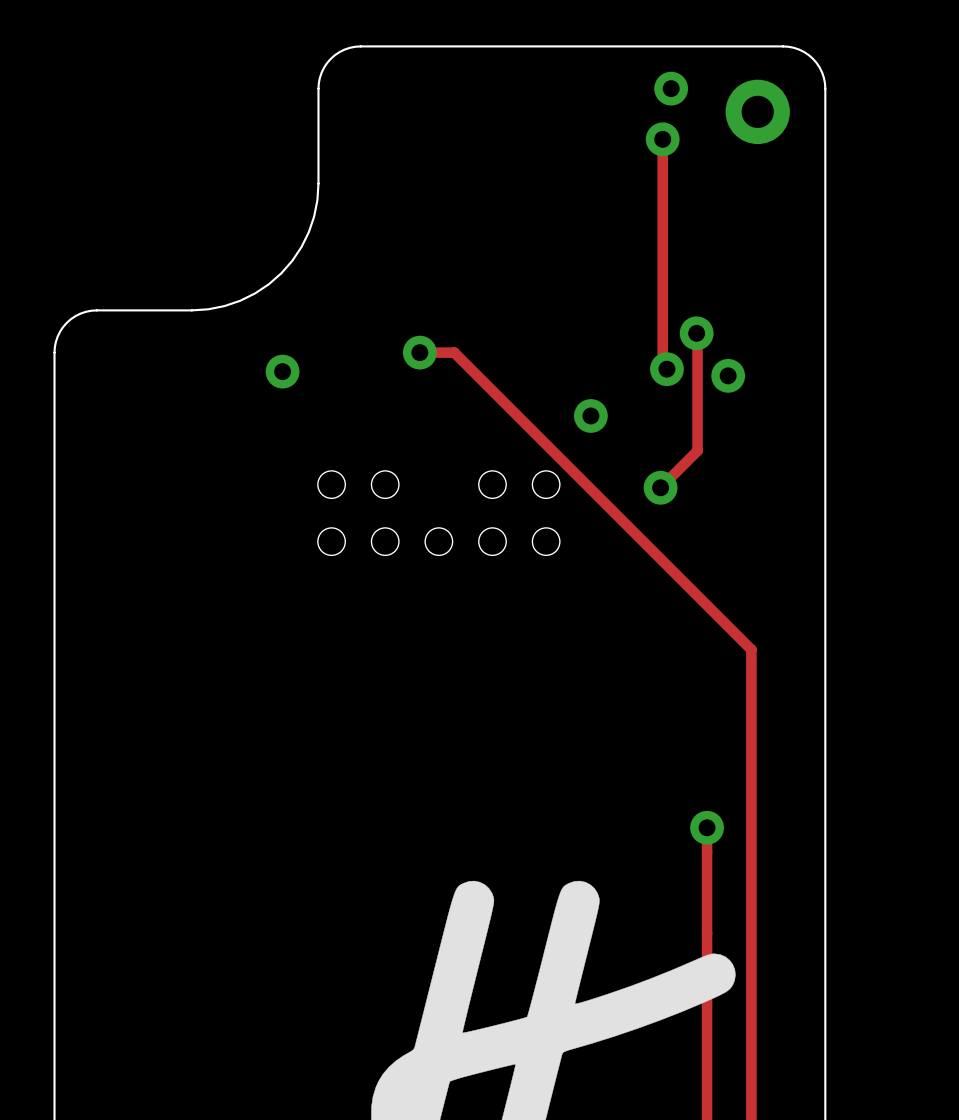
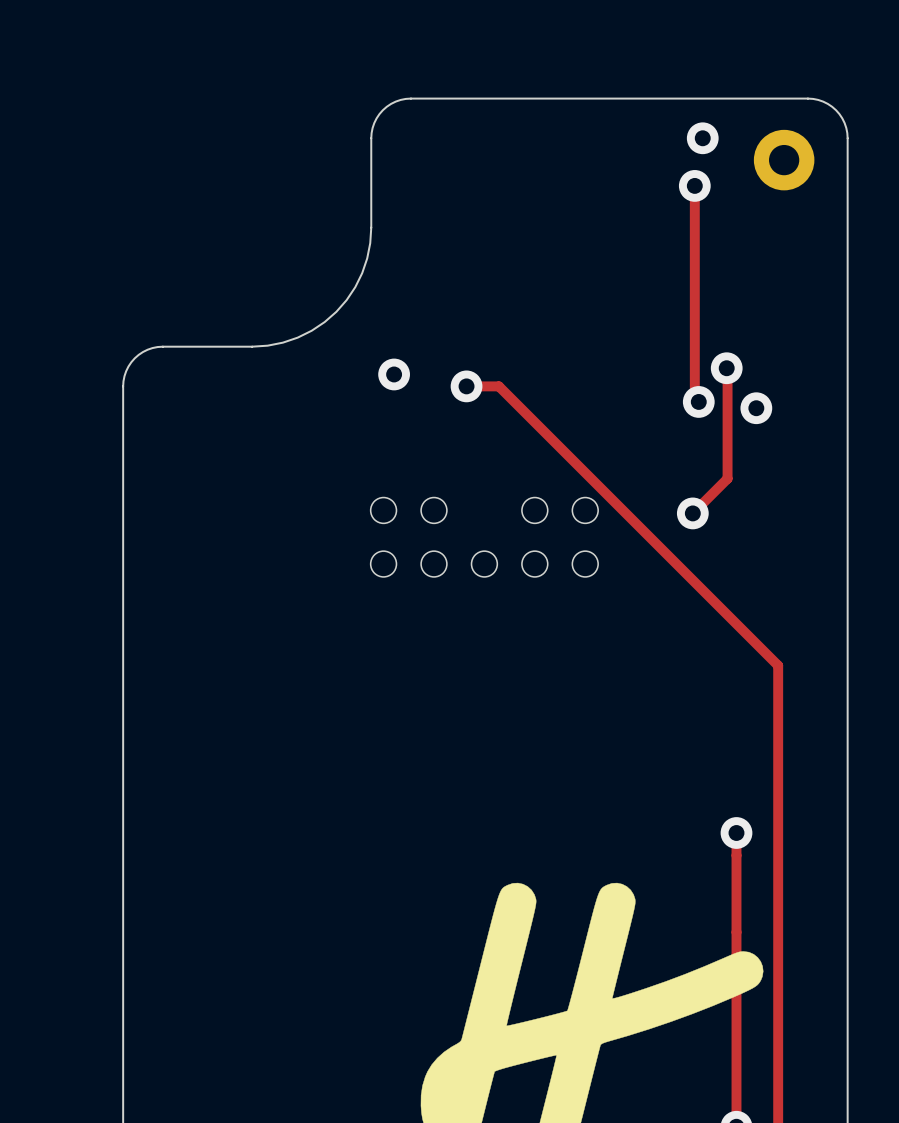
via position: (282, 371) -> (394, 374)
via: (590, 415) -> none

